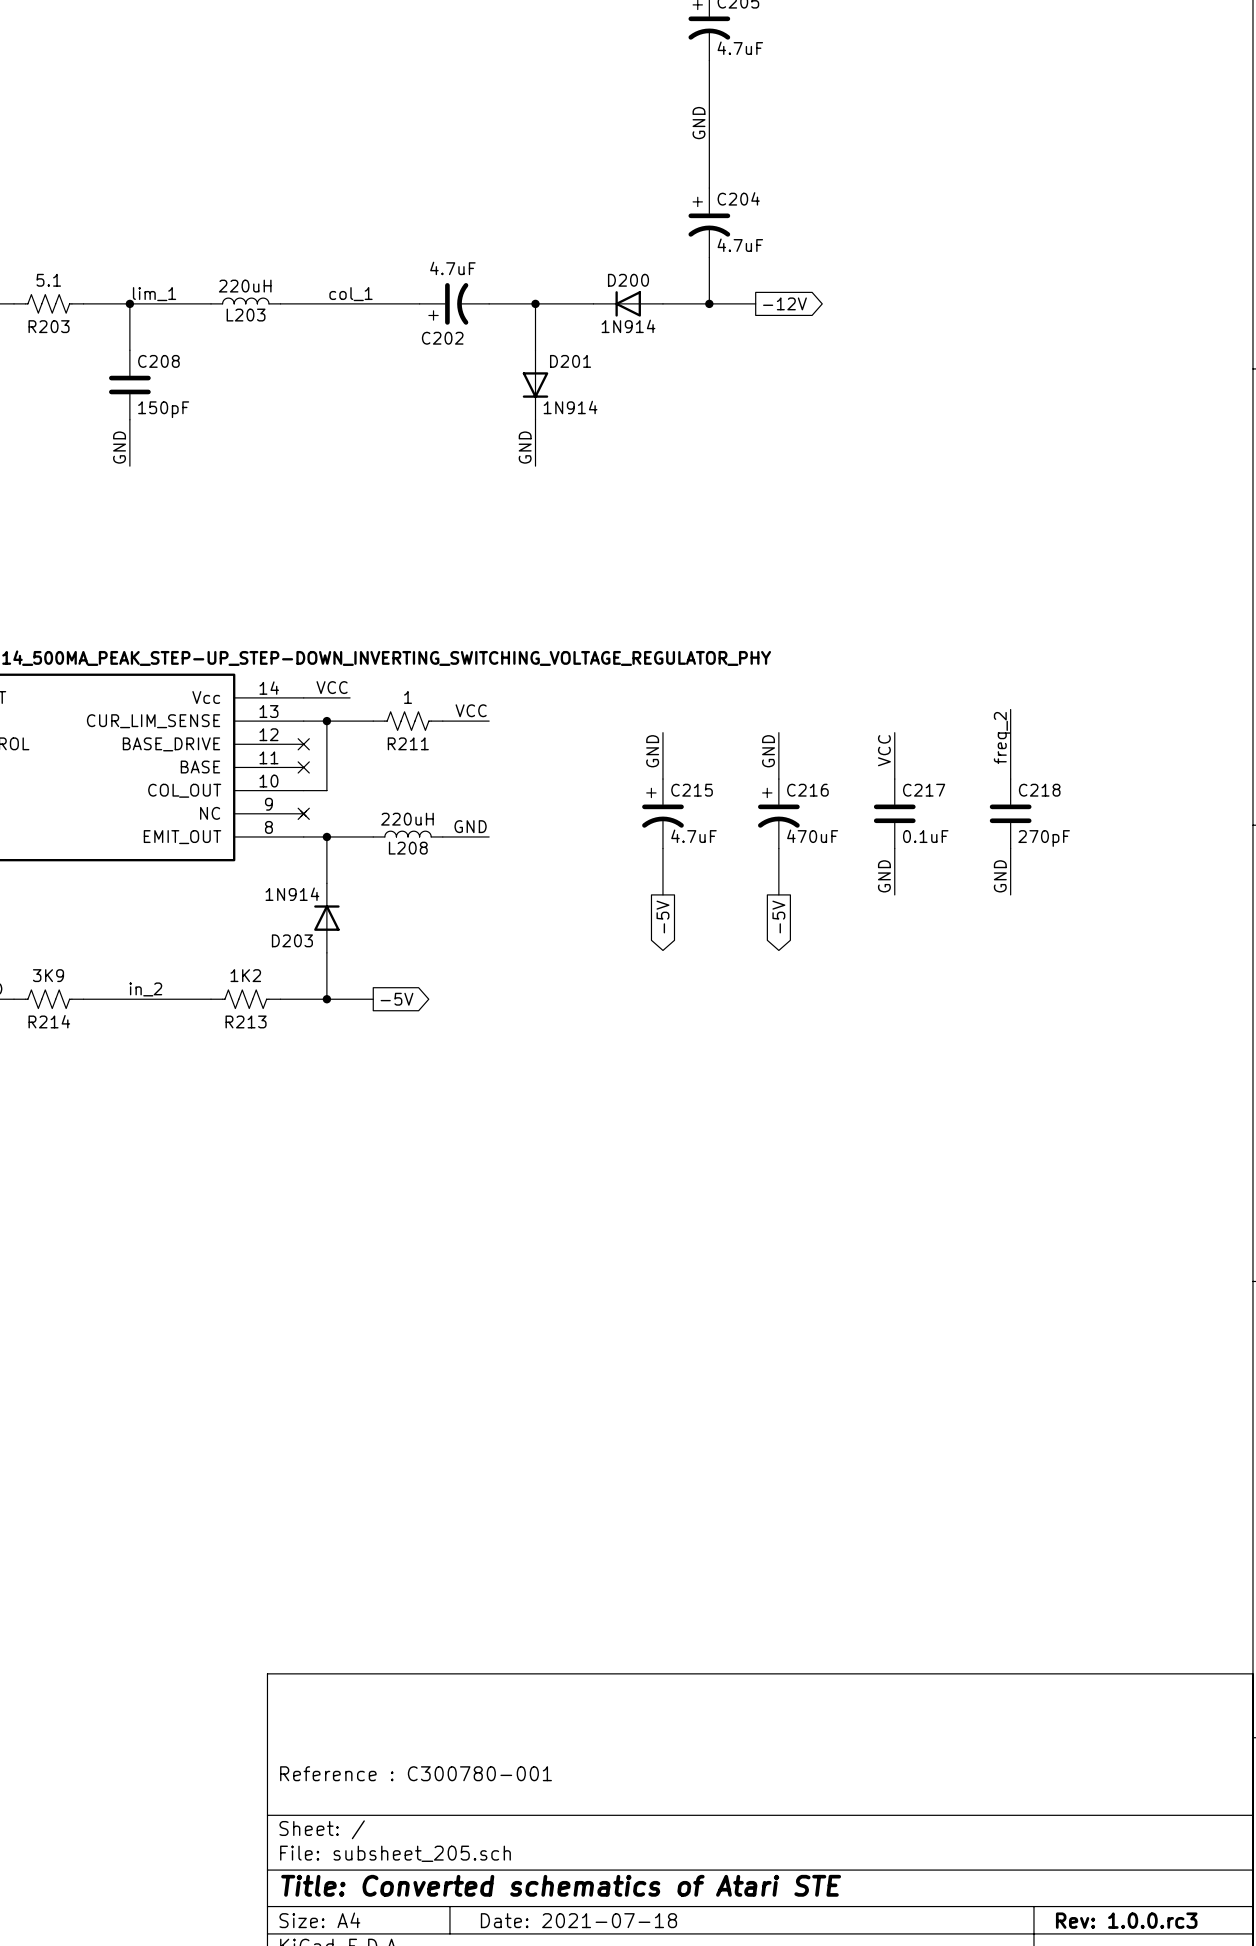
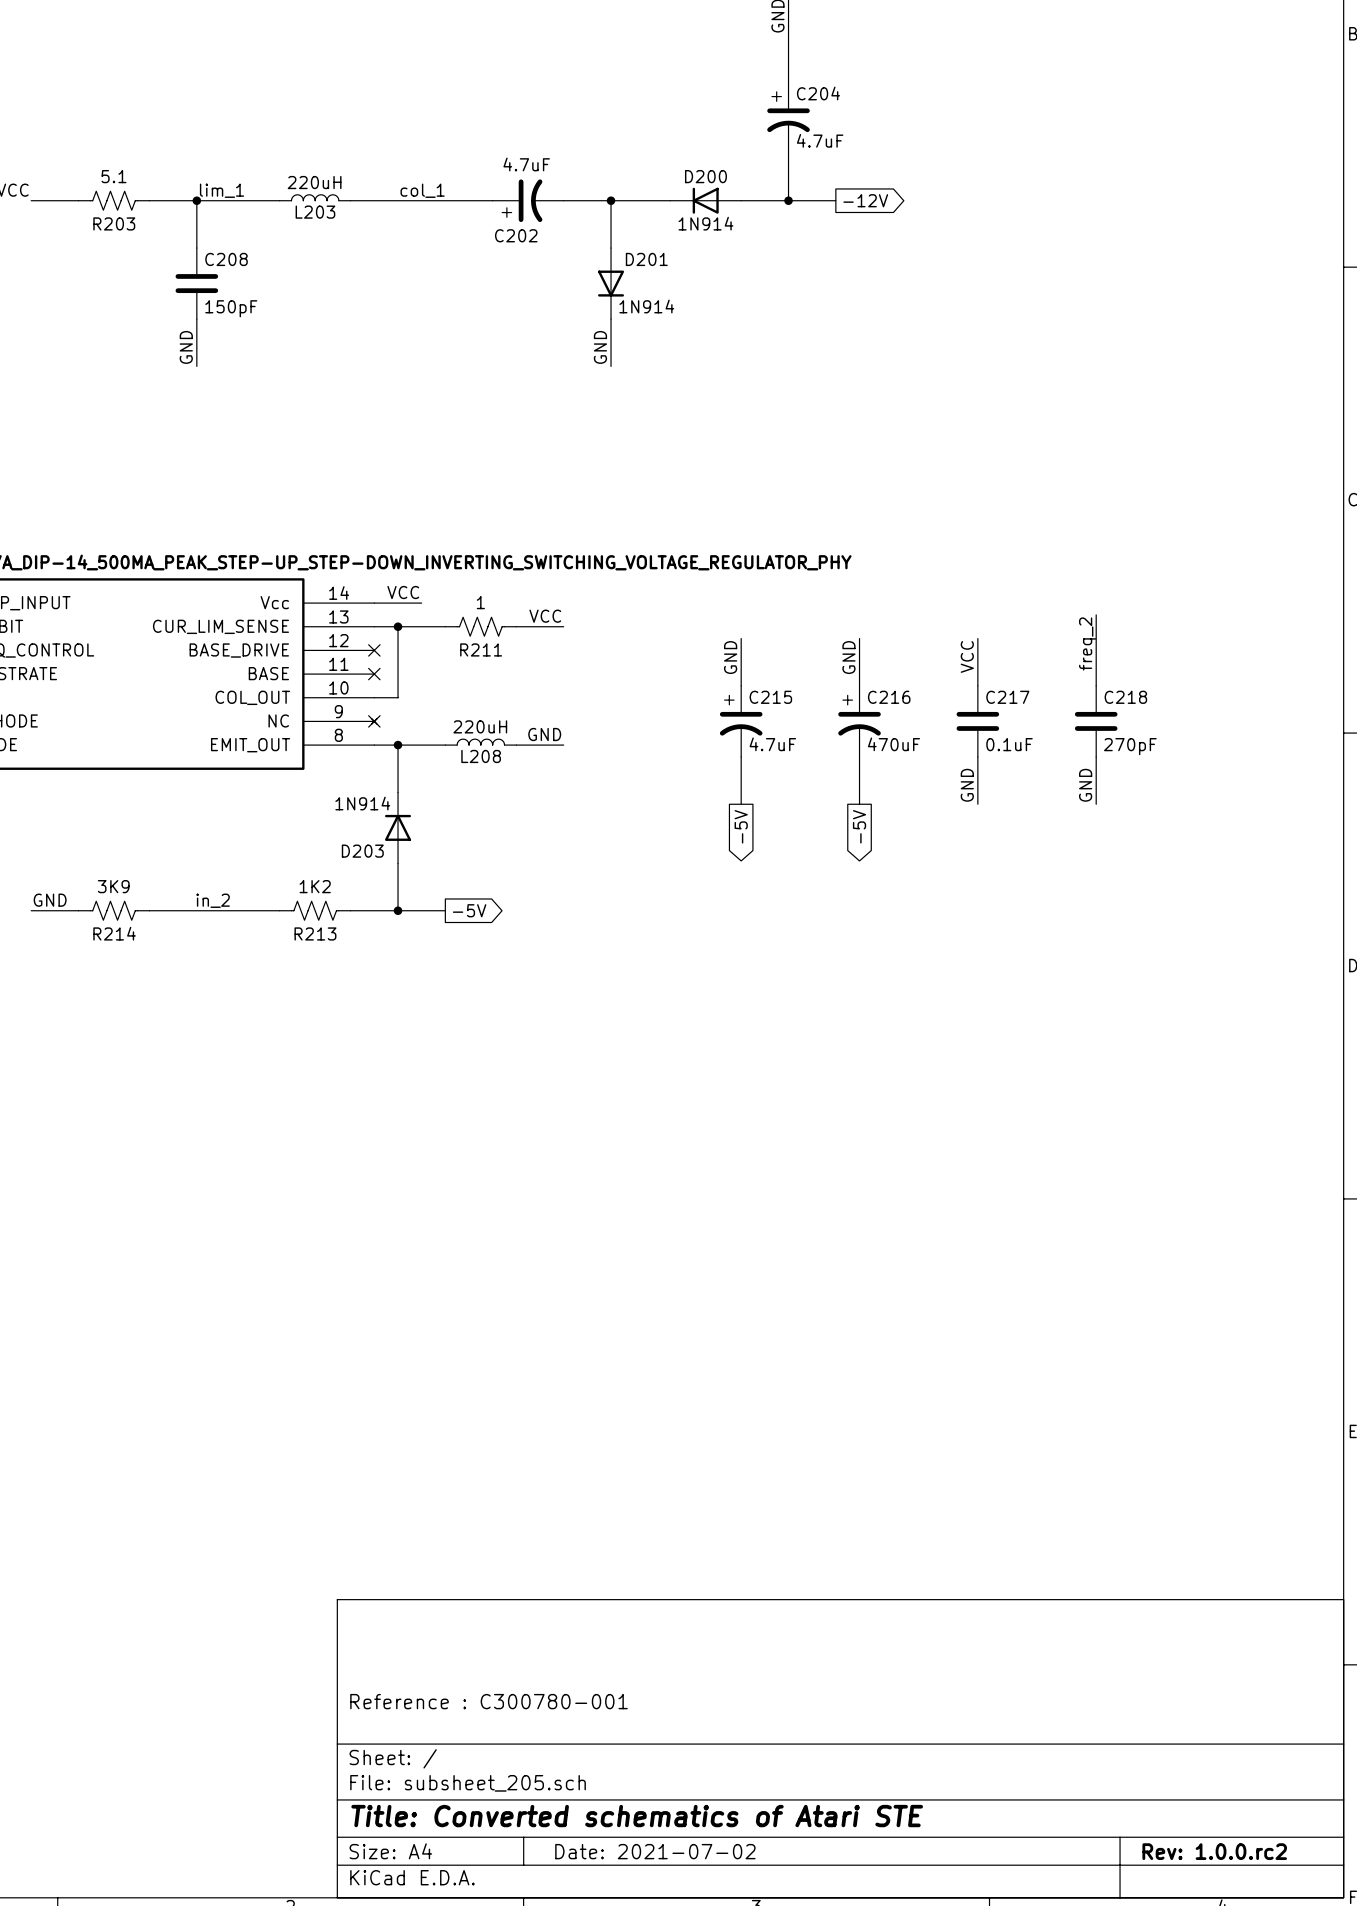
title block: Date: 2021-07-18 (578, 1920) -> Date: 2021-07-02 (655, 1851)
title block: Rev: 1.0.0.rc3 (1126, 1920) -> Rev: 1.0.0.rc2 (1214, 1851)

